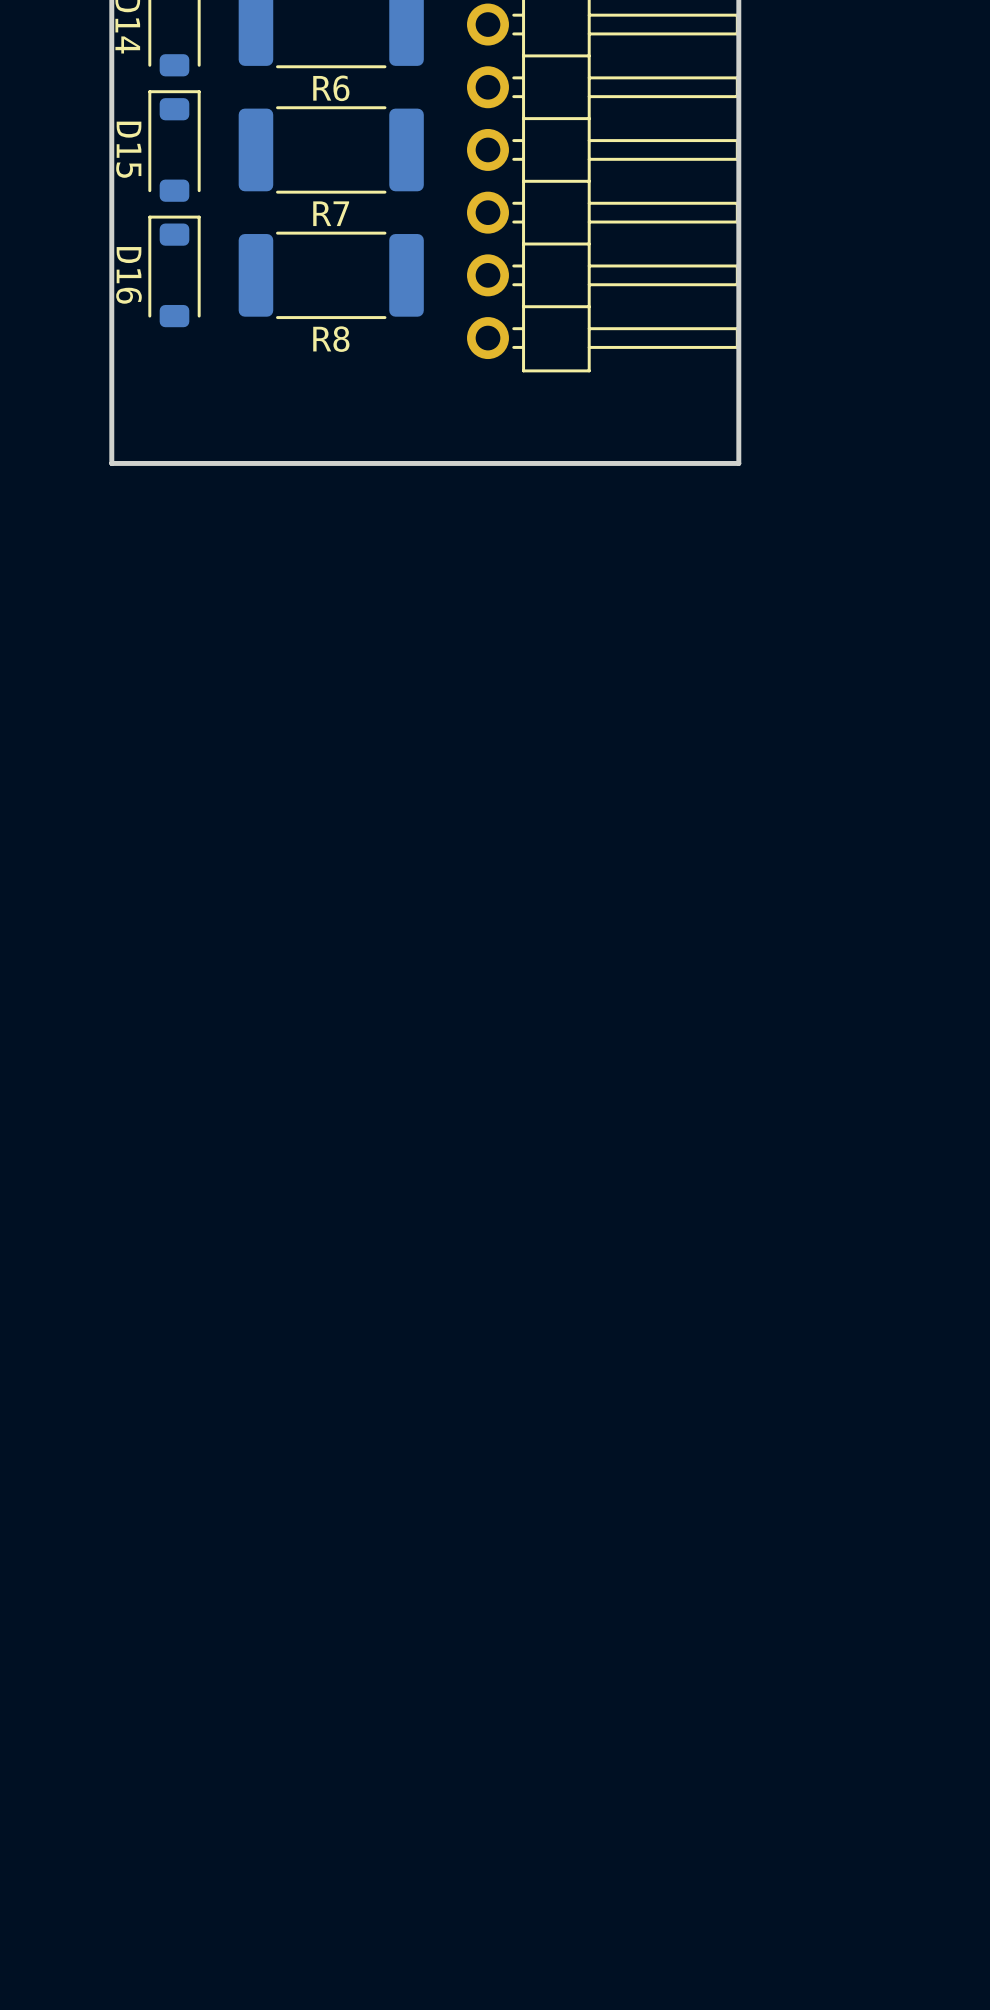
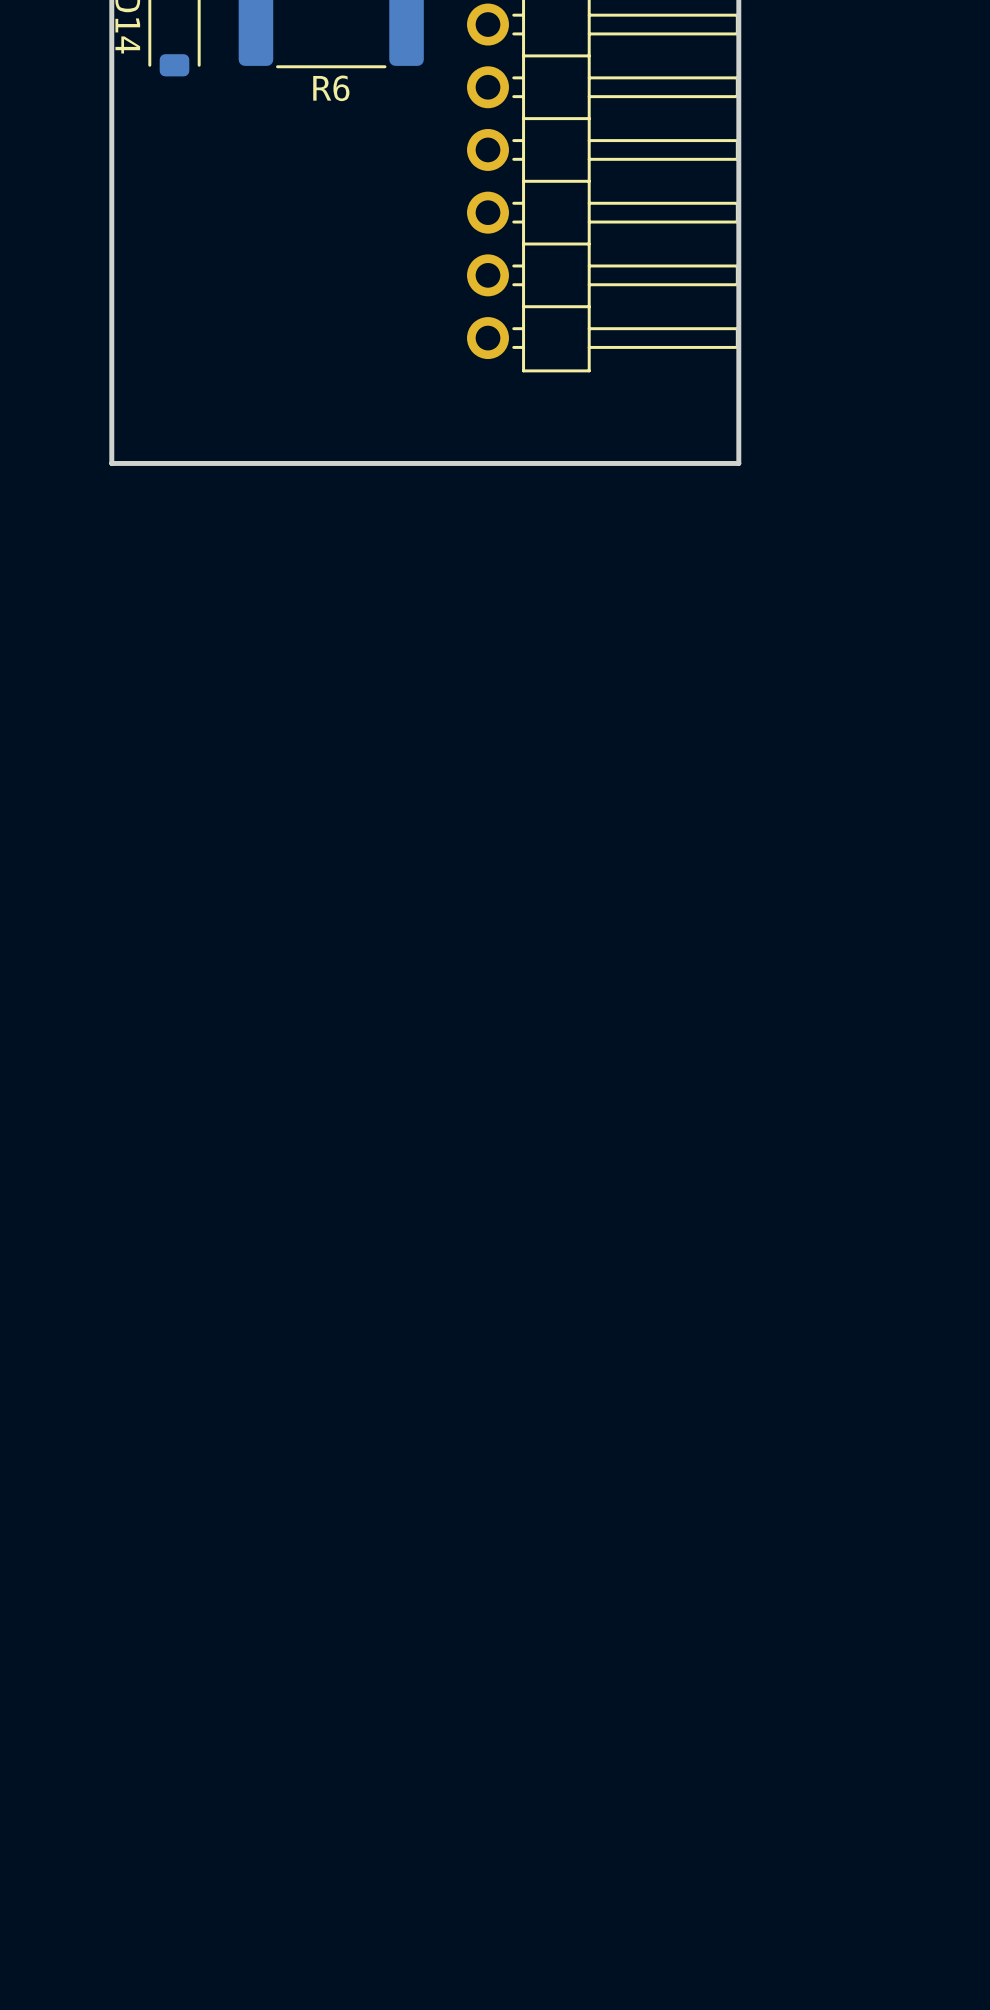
D15: (174, 146) -> none
R7: (331, 149) -> none
D16: (174, 271) -> none
R8: (331, 275) -> none

